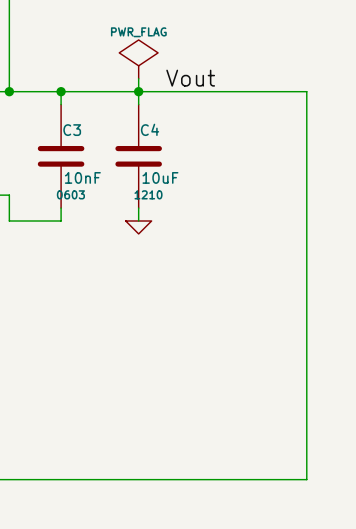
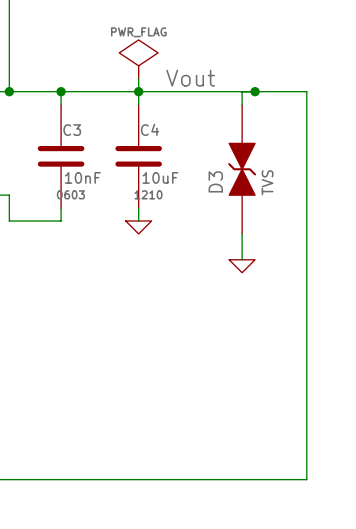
wire: none -> (242, 91) (242, 104)
junction: none -> (255, 91)
D3: none -> TVS (242, 169)
wire: none -> (242, 233) (242, 259)
power symbol: none -> (242, 266)

